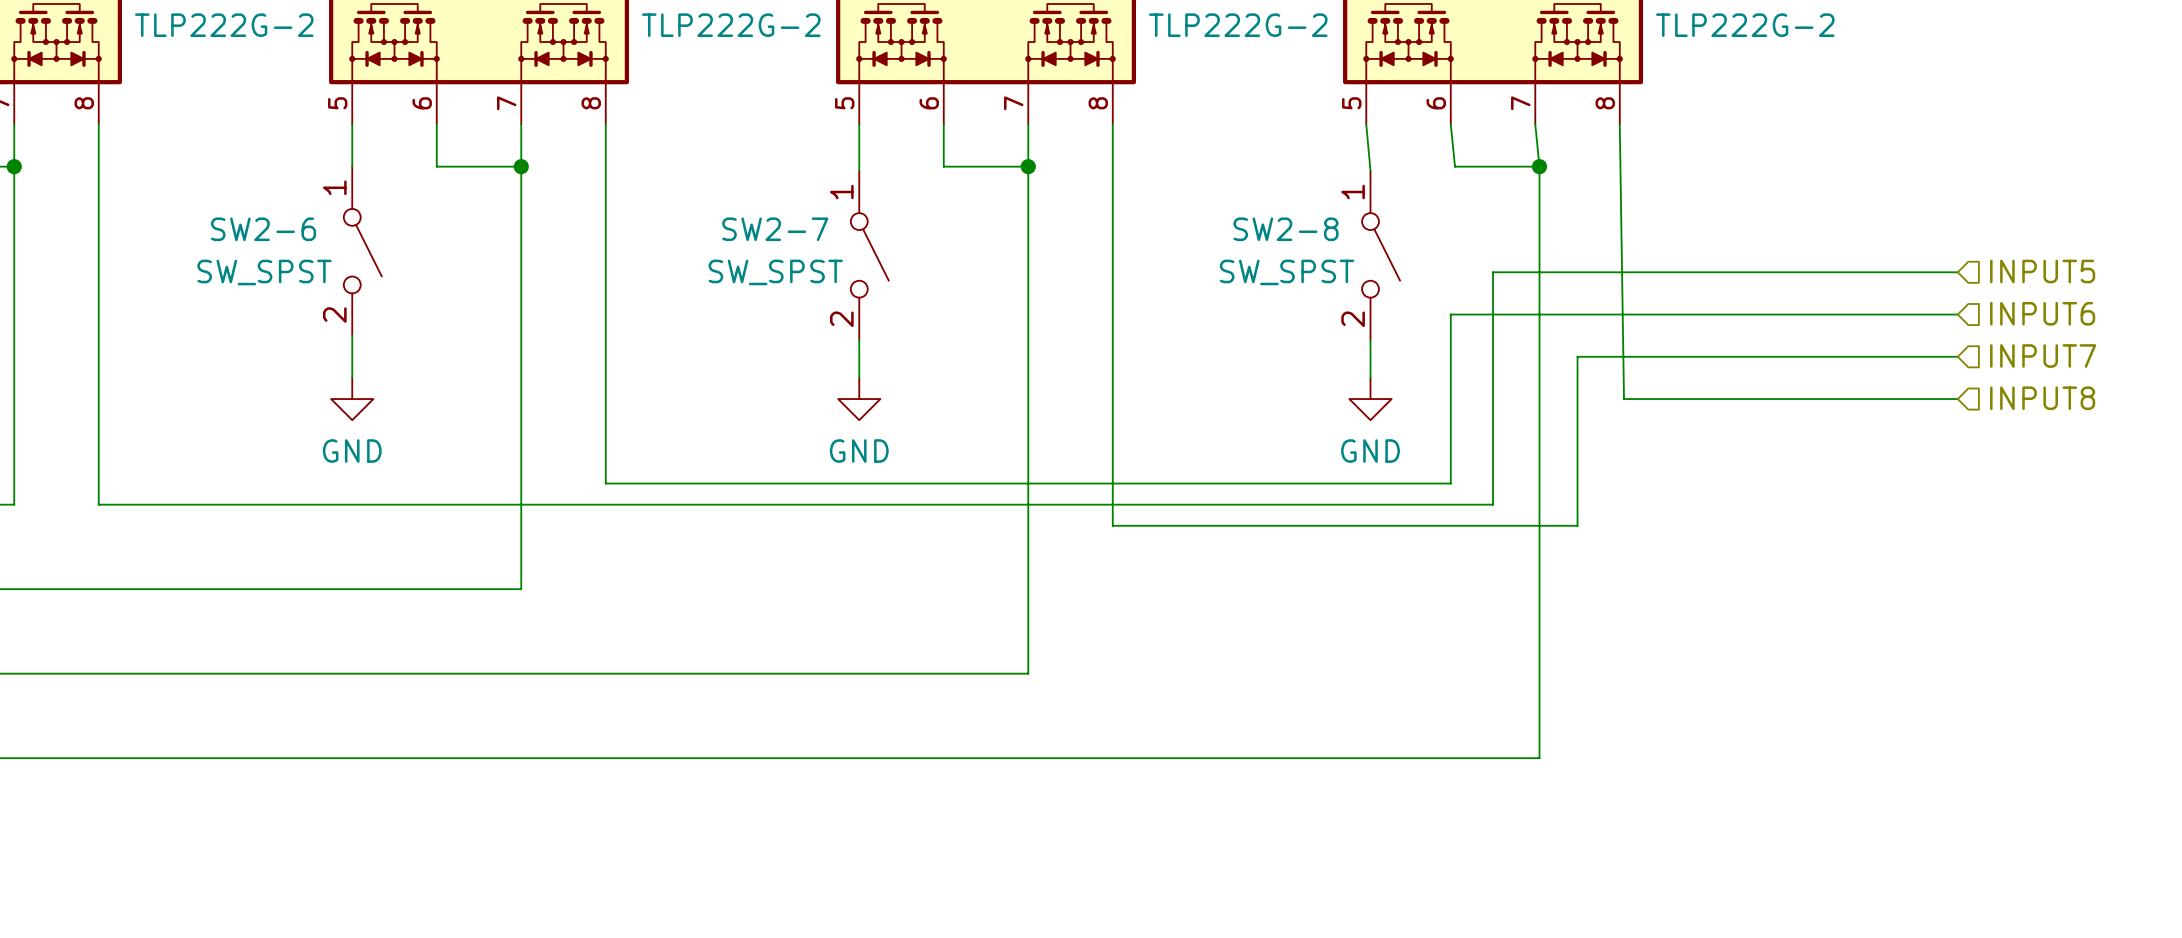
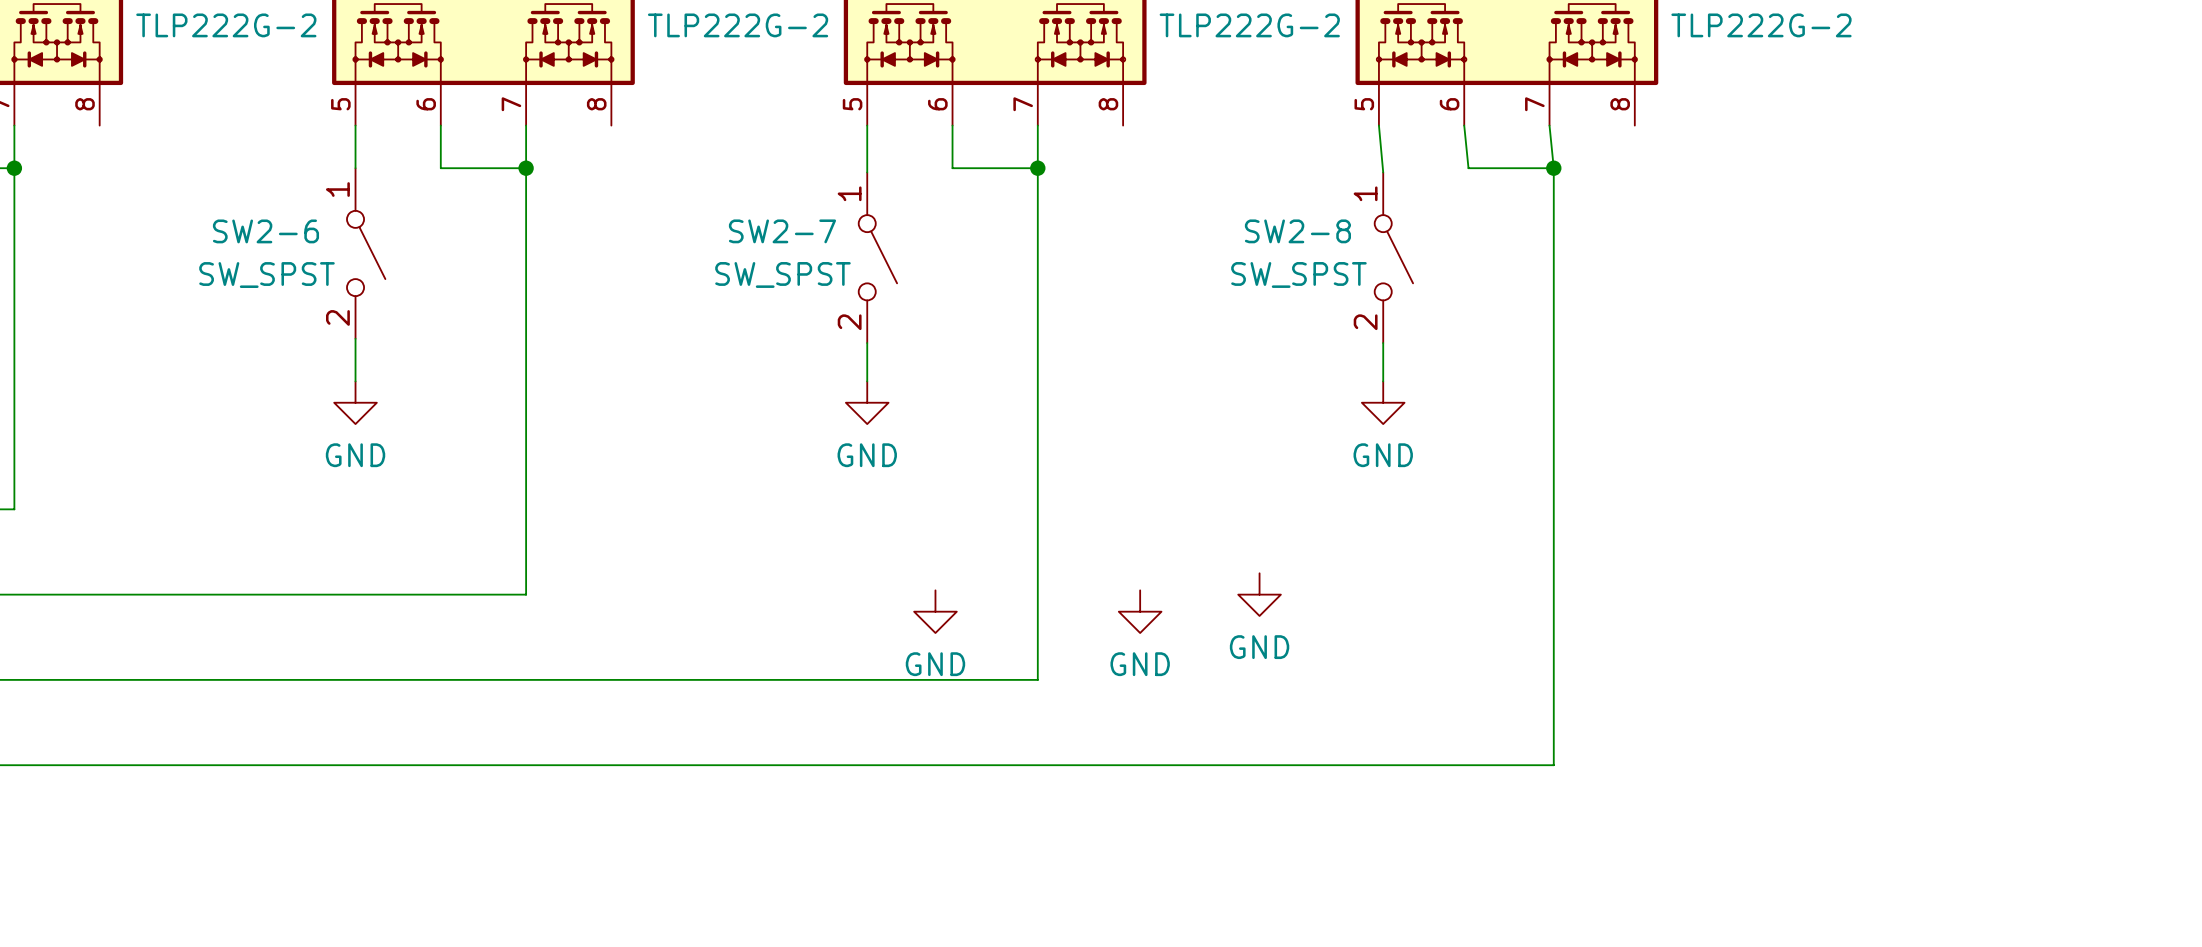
wire: (98, 124) (98, 504) (1493, 504) (1493, 272) (1957, 272) -> none
wire: (605, 124) (605, 483) (1450, 483) (1450, 314) (1957, 314) -> none
wire: (1112, 124) (1112, 525) (1577, 525) (1577, 356) (1957, 356) -> none
wire: (1619, 124) (1624, 399) (1957, 399) -> none
hierarchical label: INPUT5 (2042, 271) -> none
hierarchical label: INPUT6 (2042, 313) -> none
hierarchical label: INPUT7 (2043, 355) -> none
hierarchical label: INPUT8 (2042, 398) -> none
power symbol: none -> GND (1259, 594)
power symbol: none -> GND (935, 611)
power symbol: none -> GND (1140, 611)

